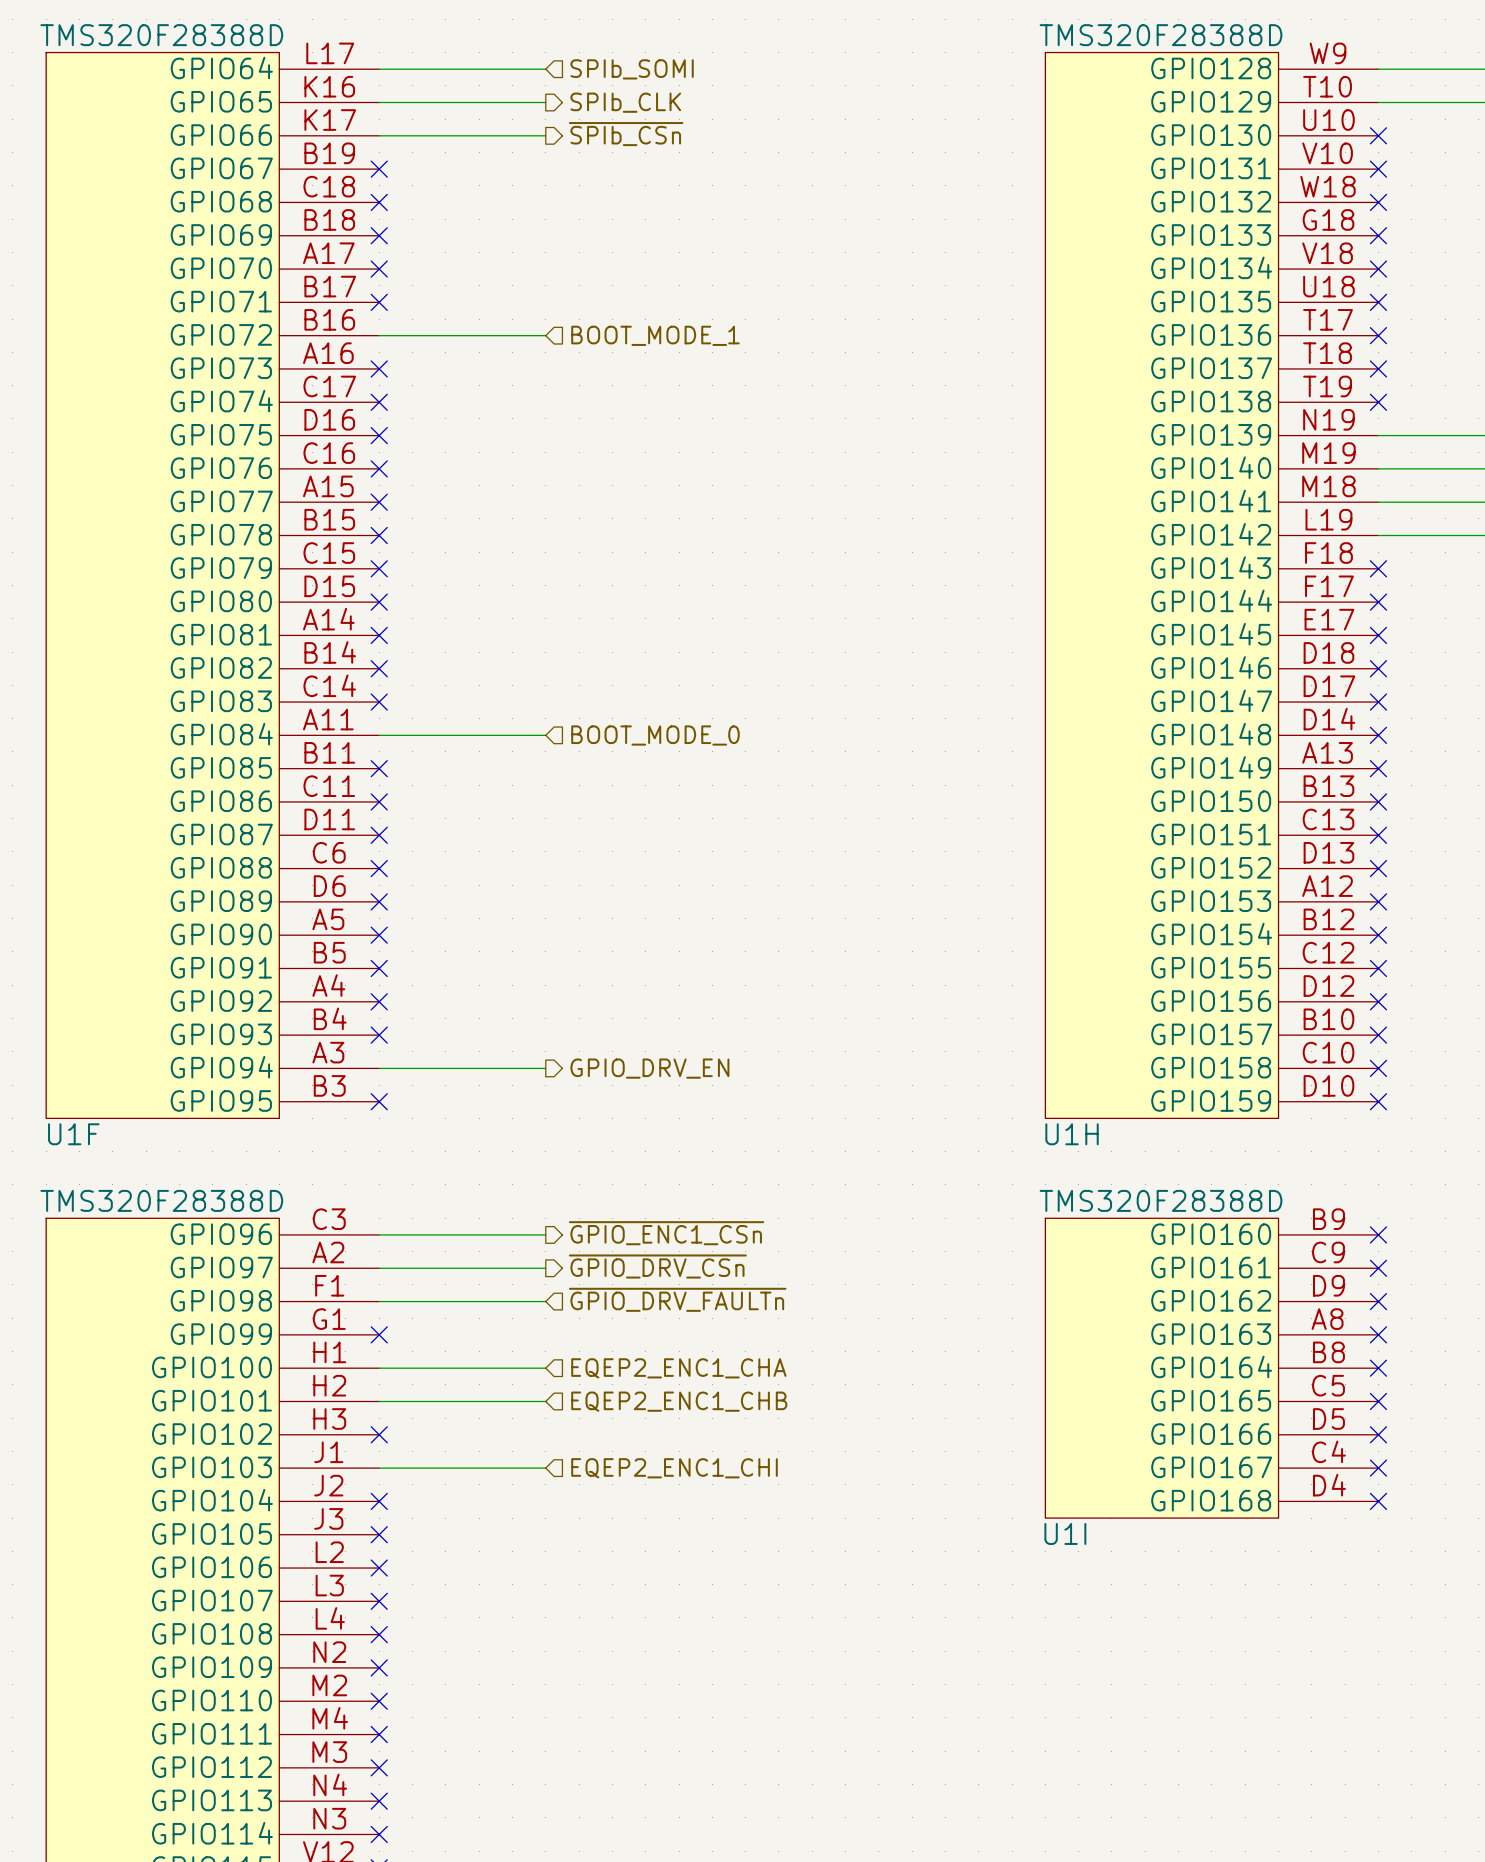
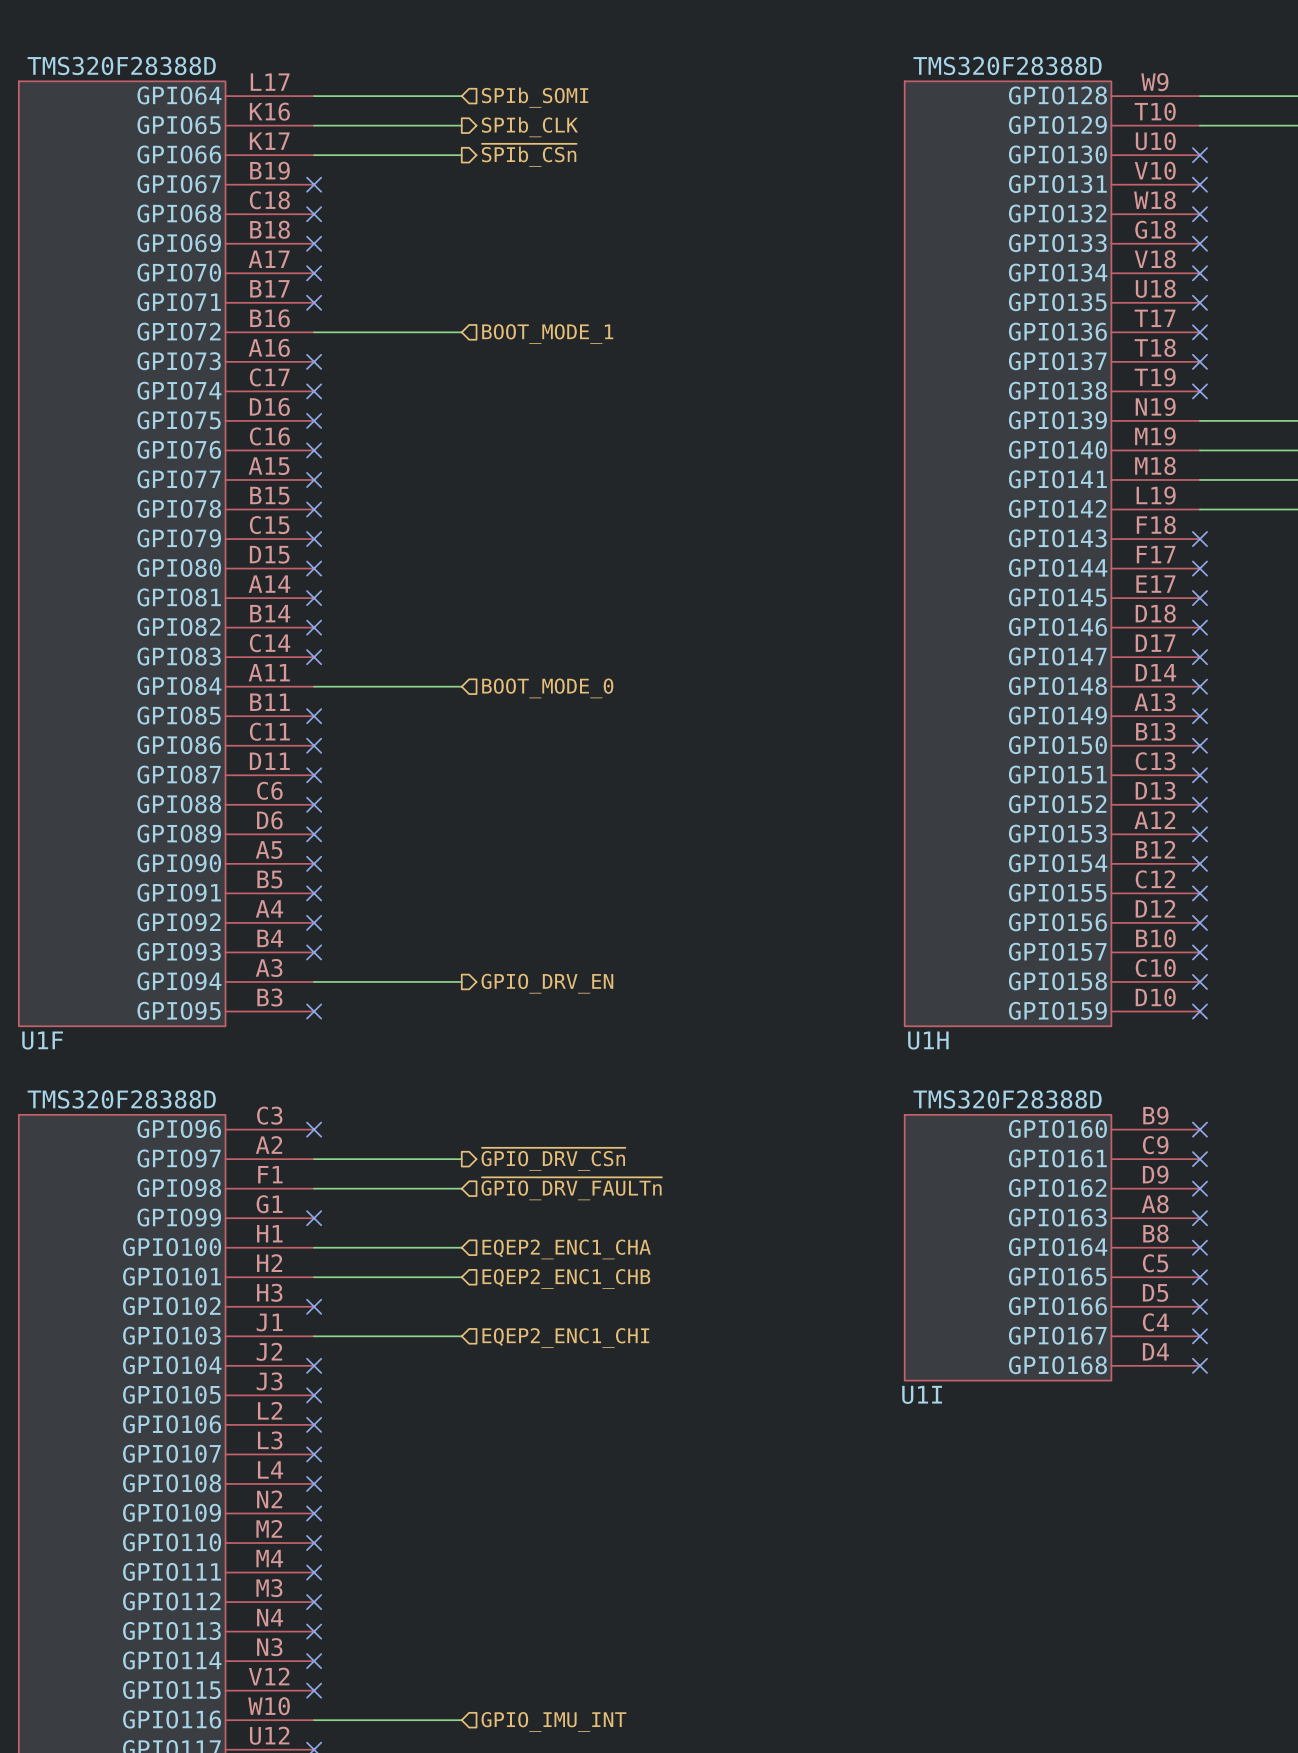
hierarchical label: ~{GPIO_ENC1_CSn} (666, 1233) -> none
wire: (379, 1234) (545, 1234) -> none
no-connect mark: none -> (314, 1129)

